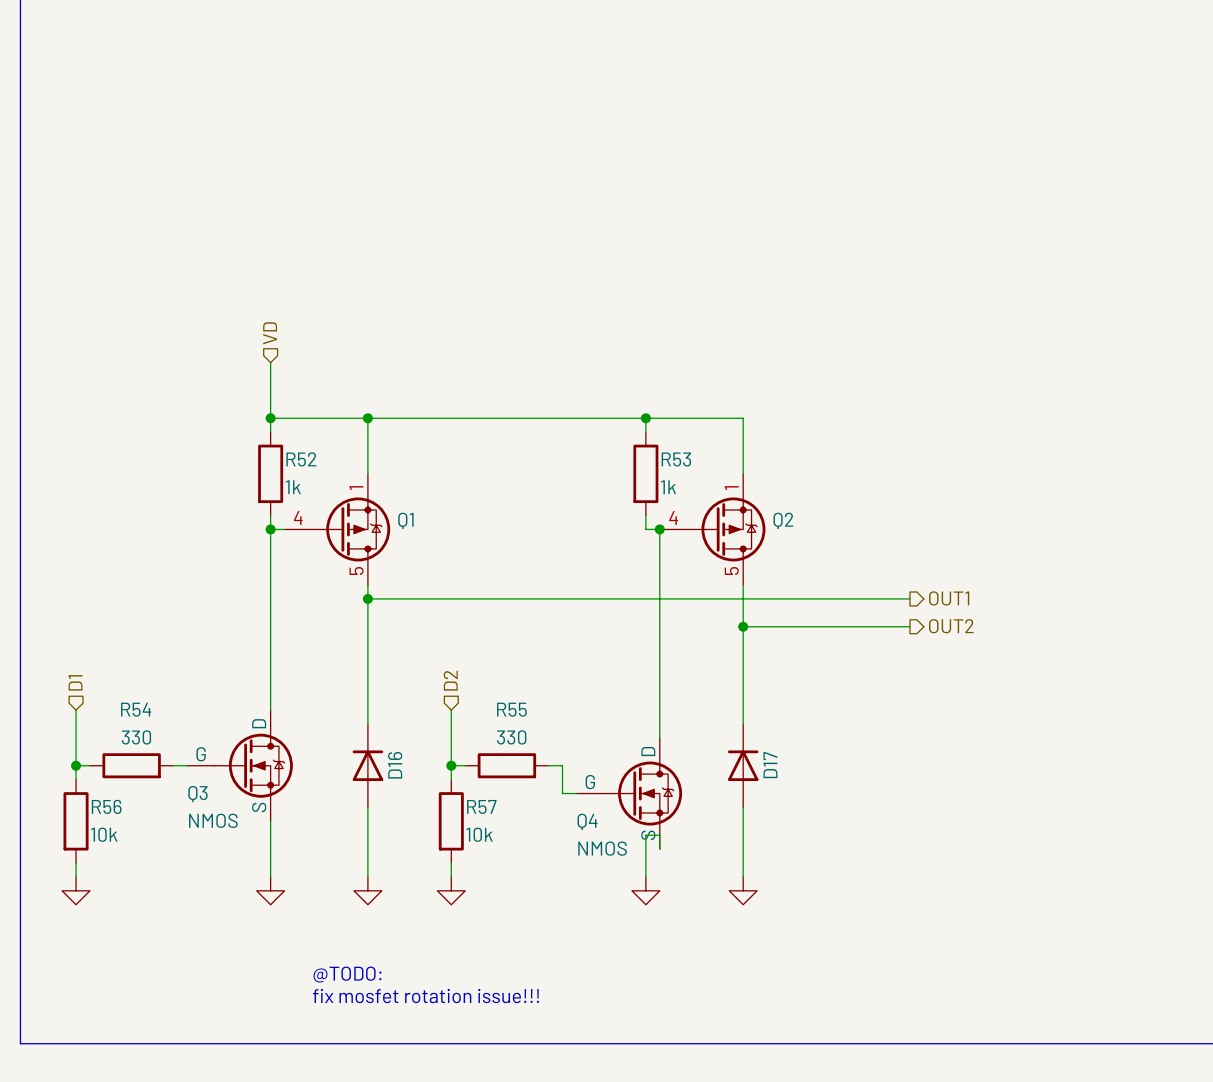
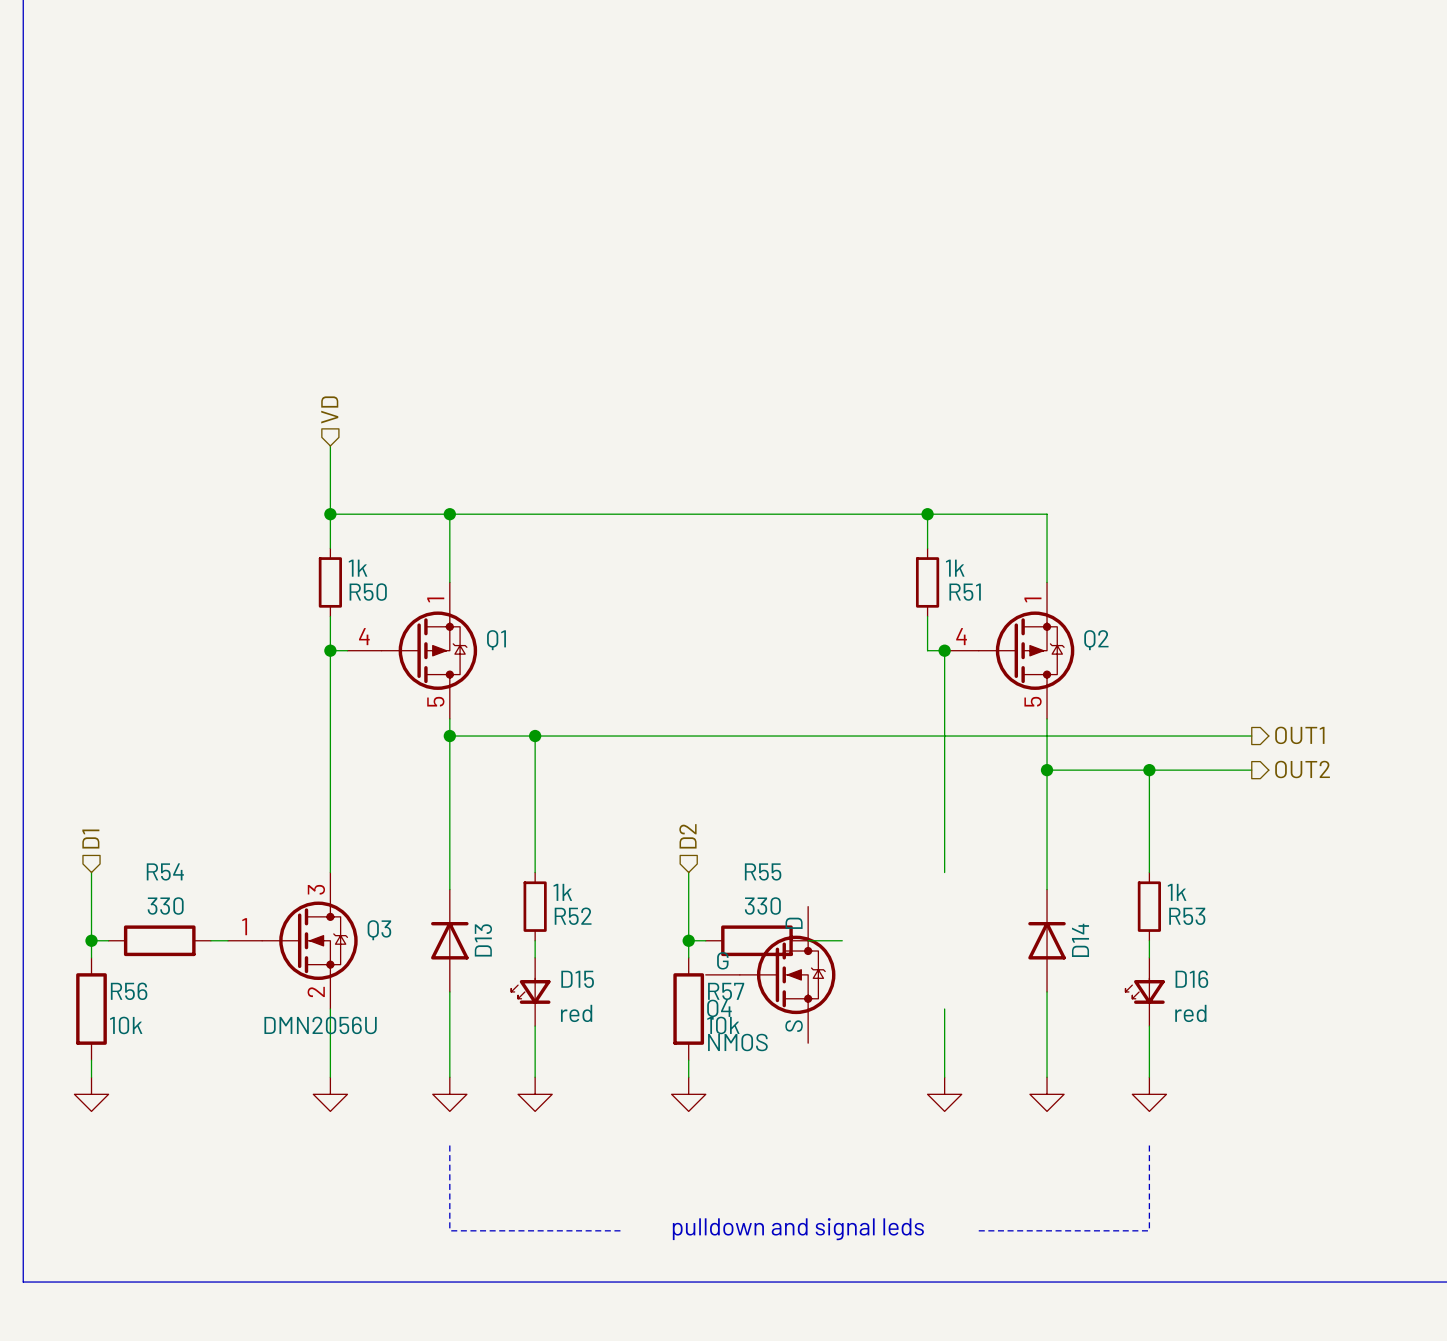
wire: (645, 418) (645, 432) -> none
junction: (645, 418) -> none
wire: (743, 418) (743, 473) -> (910, 514) (1047, 514) (1047, 582)
wire: none -> (927, 514) (927, 548)
junction: none -> (927, 514)
R52 symbol: [258, 432, 284, 516] -> [523, 872, 547, 941]
R53 symbol: [633, 432, 659, 516] -> [1137, 872, 1161, 941]
R52 name position: R52 (301, 459) -> R52 (573, 916)
R53 name position: R53 (676, 459) -> R53 (1187, 916)
R50: none -> 1k (330, 582)
R51: none -> 1k (927, 582)
R52 value position: 1k (293, 487) -> 1k (562, 892)
R53 value position: 1k (668, 487) -> 1k (1177, 892)
wire: none -> (927, 616) (927, 650) (944, 650) (944, 872)
wire: (645, 515) (645, 529) (659, 529) (659, 737) -> none
junction: (659, 529) -> none
Q2 position: (712, 529) -> (1009, 650)
junction: none -> (944, 650)
wire: (743, 585) (743, 724) -> (1047, 718) (1047, 889)
wire: none -> (535, 736) (535, 872)
junction: none -> (535, 736)
wire: none -> (1115, 736) (1251, 736)
hierarchical label position: OUT1 (949, 598) -> OUT1 (1299, 735)
wire: (743, 626) (854, 626) -> (1115, 770) (1251, 770)
junction: (743, 626) -> none
junction: none -> (1047, 770)
wire: none -> (1149, 770) (1149, 872)
junction: none -> (1149, 770)
hierarchical label position: OUT2 (951, 626) -> OUT2 (1302, 769)
hierarchical label position: D2 (450, 680) -> D2 (687, 836)
wire: (451, 710) (451, 779) -> none
wire: none -> (688, 872) (688, 940) (705, 940)
Q3 pin name: D (259, 723) -> none
Q3 pin number: none -> 3 (316, 889)
Q3 pin number: none -> 1 (244, 926)
Q3 pin name: G (201, 754) -> none
D16 name: D16 (395, 765) -> D13 (483, 940)
wire: none -> (535, 940) (535, 957)
wire: (451, 765) (465, 765) -> none
junction: (451, 765) -> none
R55 position: (506, 765) -> (756, 940)
wire: (548, 765) (562, 765) -> none
junction: none -> (688, 940)
wire: none -> (808, 940) (842, 940)
D17: (743, 765) -> none
D14: none -> (1047, 940)
wire: none -> (1149, 940) (1149, 957)
Q3 name position: Q3 (197, 794) -> Q3 (379, 930)
Q3 pin name: S (259, 807) -> none
Q3 pin number: none -> 2 (316, 991)
D15: none -> red (530, 991)
wire: (743, 807) (743, 876) -> (1047, 991) (1047, 1077)
D16: none -> red (1145, 991)
Q3 value: NMOS (213, 820) -> DMN2056U (320, 1025)
R57 position: (451, 821) -> (688, 1009)
wire: none -> (944, 1009) (944, 1077)
wire: none -> (535, 1026) (535, 1077)
wire: none -> (1149, 1026) (1149, 1077)
wire: (659, 849) (659, 835) (645, 835) (645, 876) -> none
wire: (451, 863) (451, 876) -> (688, 1060) (688, 1077)
power symbol position: (451, 890) -> (535, 1094)
power symbol: none -> (688, 1094)
power symbol: (645, 890) -> none
power symbol position: (743, 890) -> (944, 1094)
power symbol: none -> (1047, 1094)
power symbol: none -> (1149, 1094)
line: none -> (449, 1145) (449, 1230) (620, 1230)
line: none -> (1149, 1145) (1149, 1230) (978, 1230)
text: @TODO: (347, 974) -> none
text: fix mosfet rotation issue!!! (426, 996) -> none
text: none -> pulldown and signal leds (798, 1229)

